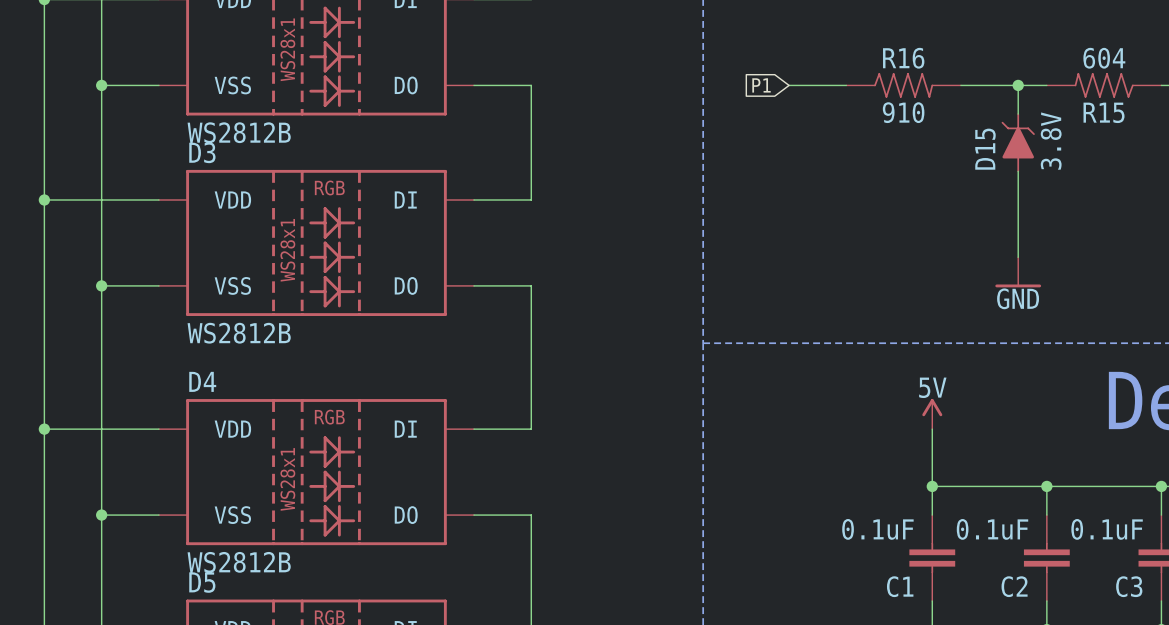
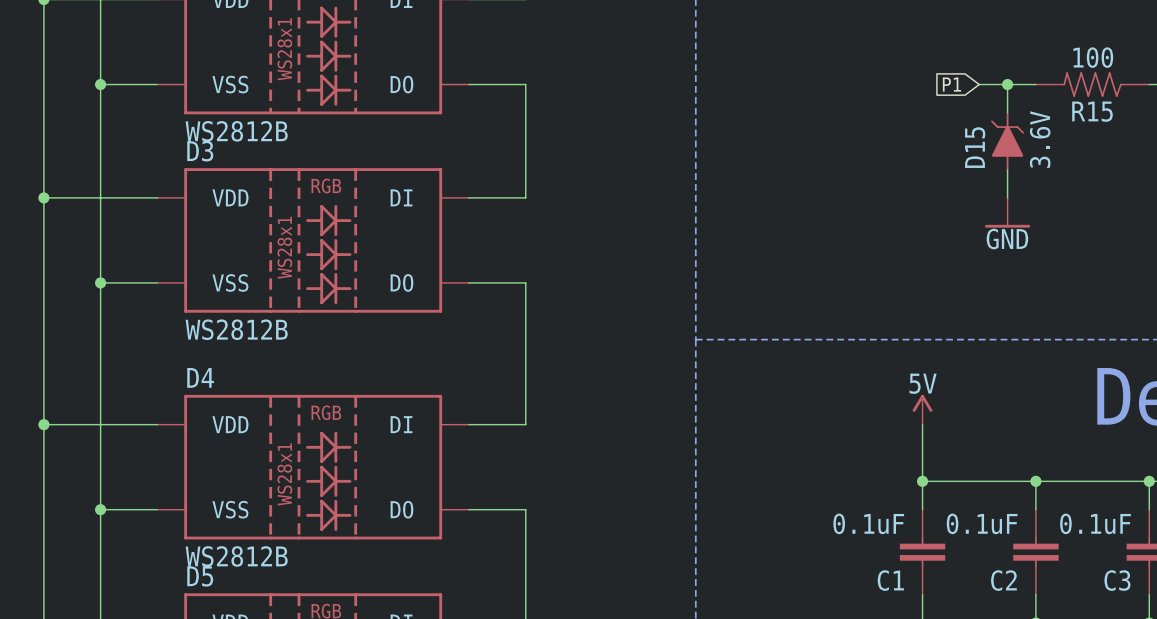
R15 value: 604 (1104, 58) -> 100 (1093, 57)
global label position: P1 (761, 85) -> P1 (951, 84)
wire: (789, 85) (846, 85) -> none
R16: 910 (903, 85) -> none
wire: (960, 85) (989, 85) -> none
D15 value: 3.8V (1051, 141) -> 3.6V (1040, 139)
power symbol position: GND (1018, 272) -> GND (1007, 212)

